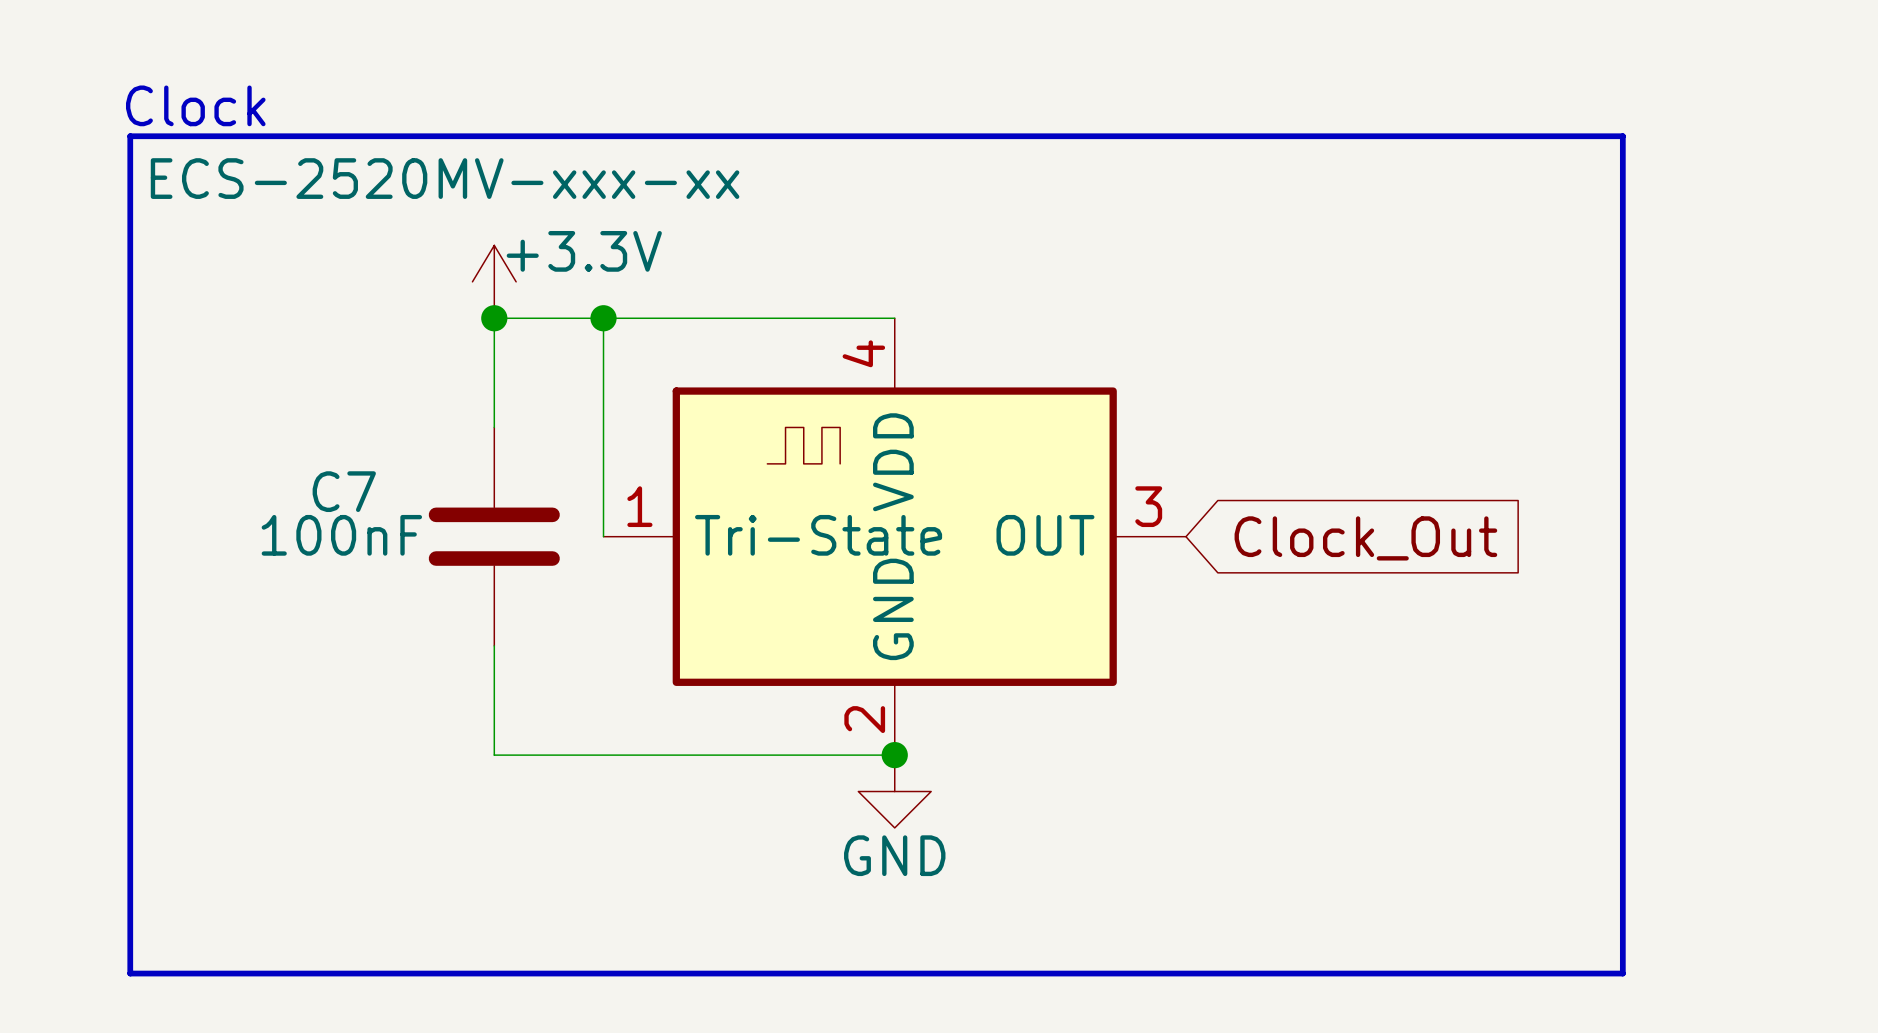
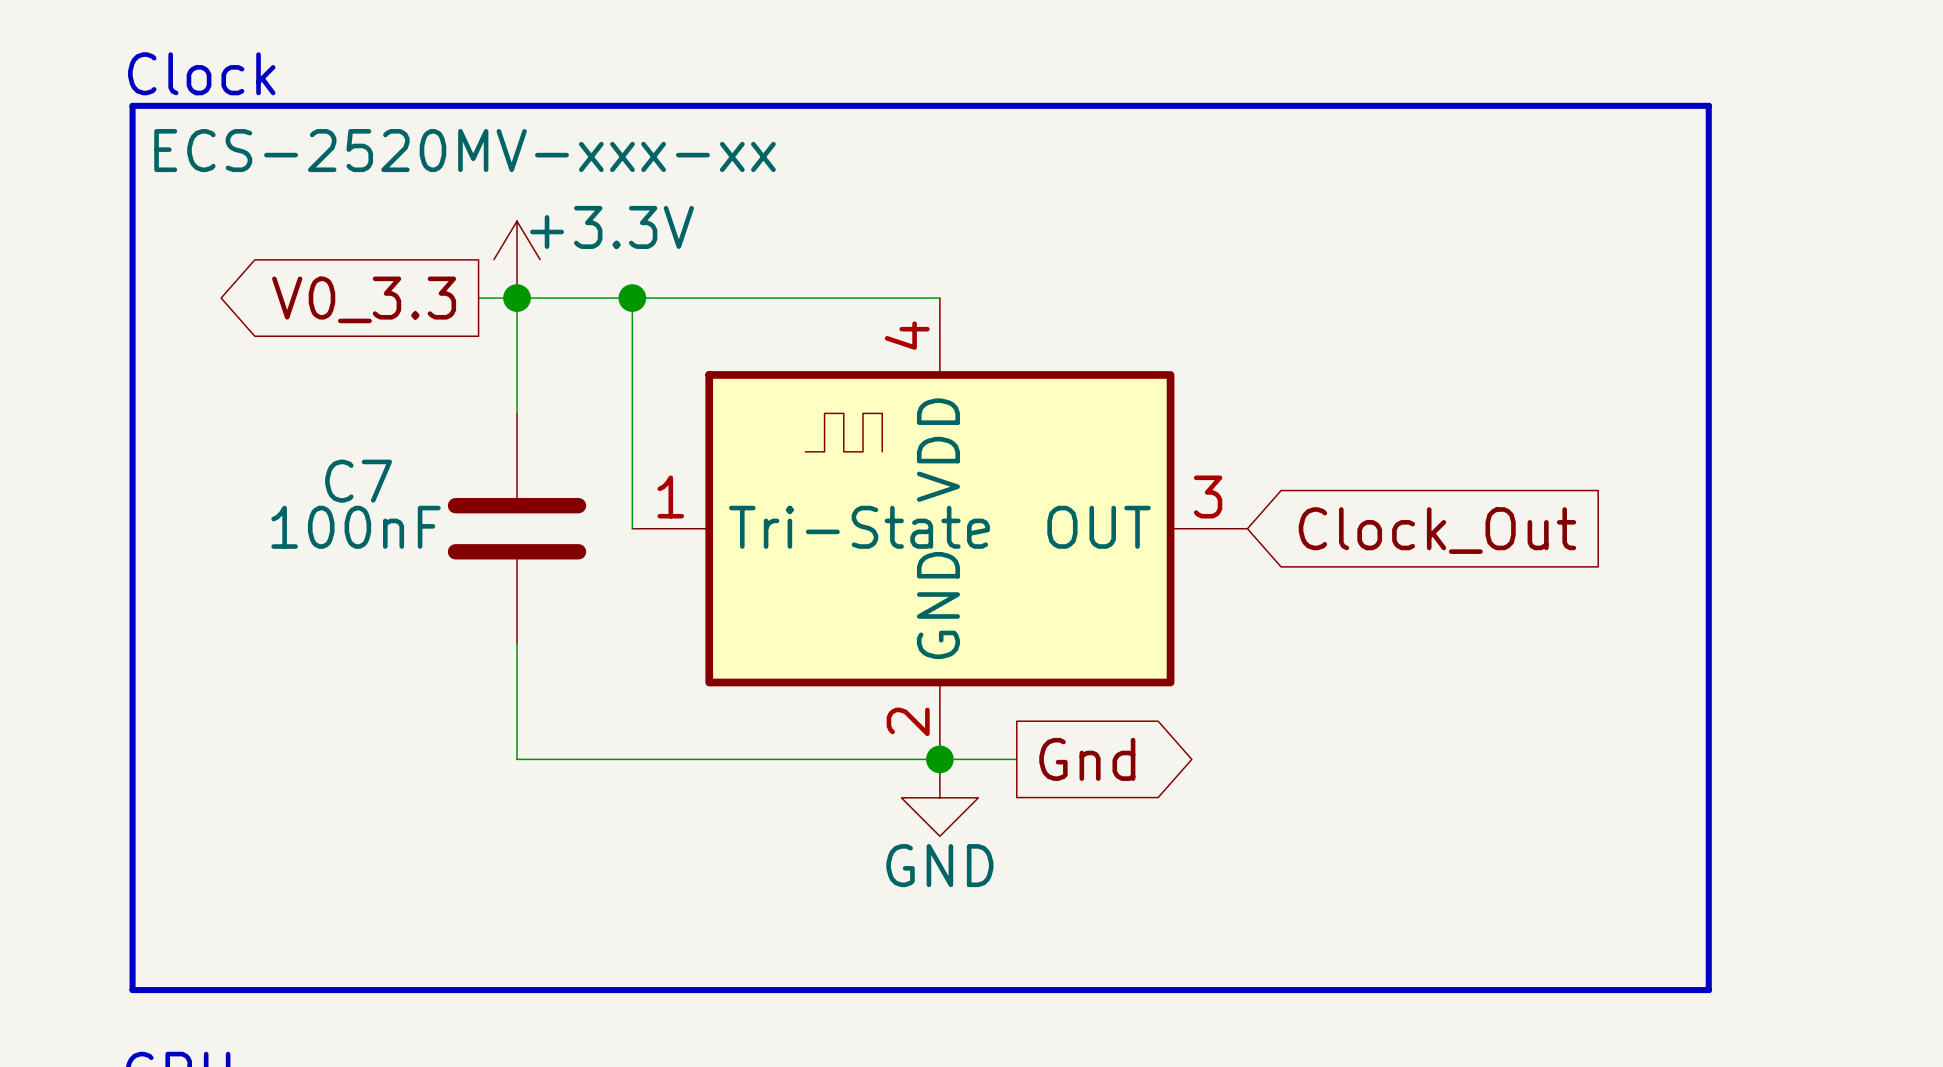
wire: none -> (478, 298) (517, 298)
global label: none -> V0_3.3 (364, 299)
wire: none -> (939, 759) (1016, 759)
global label: none -> Gnd (1087, 759)

